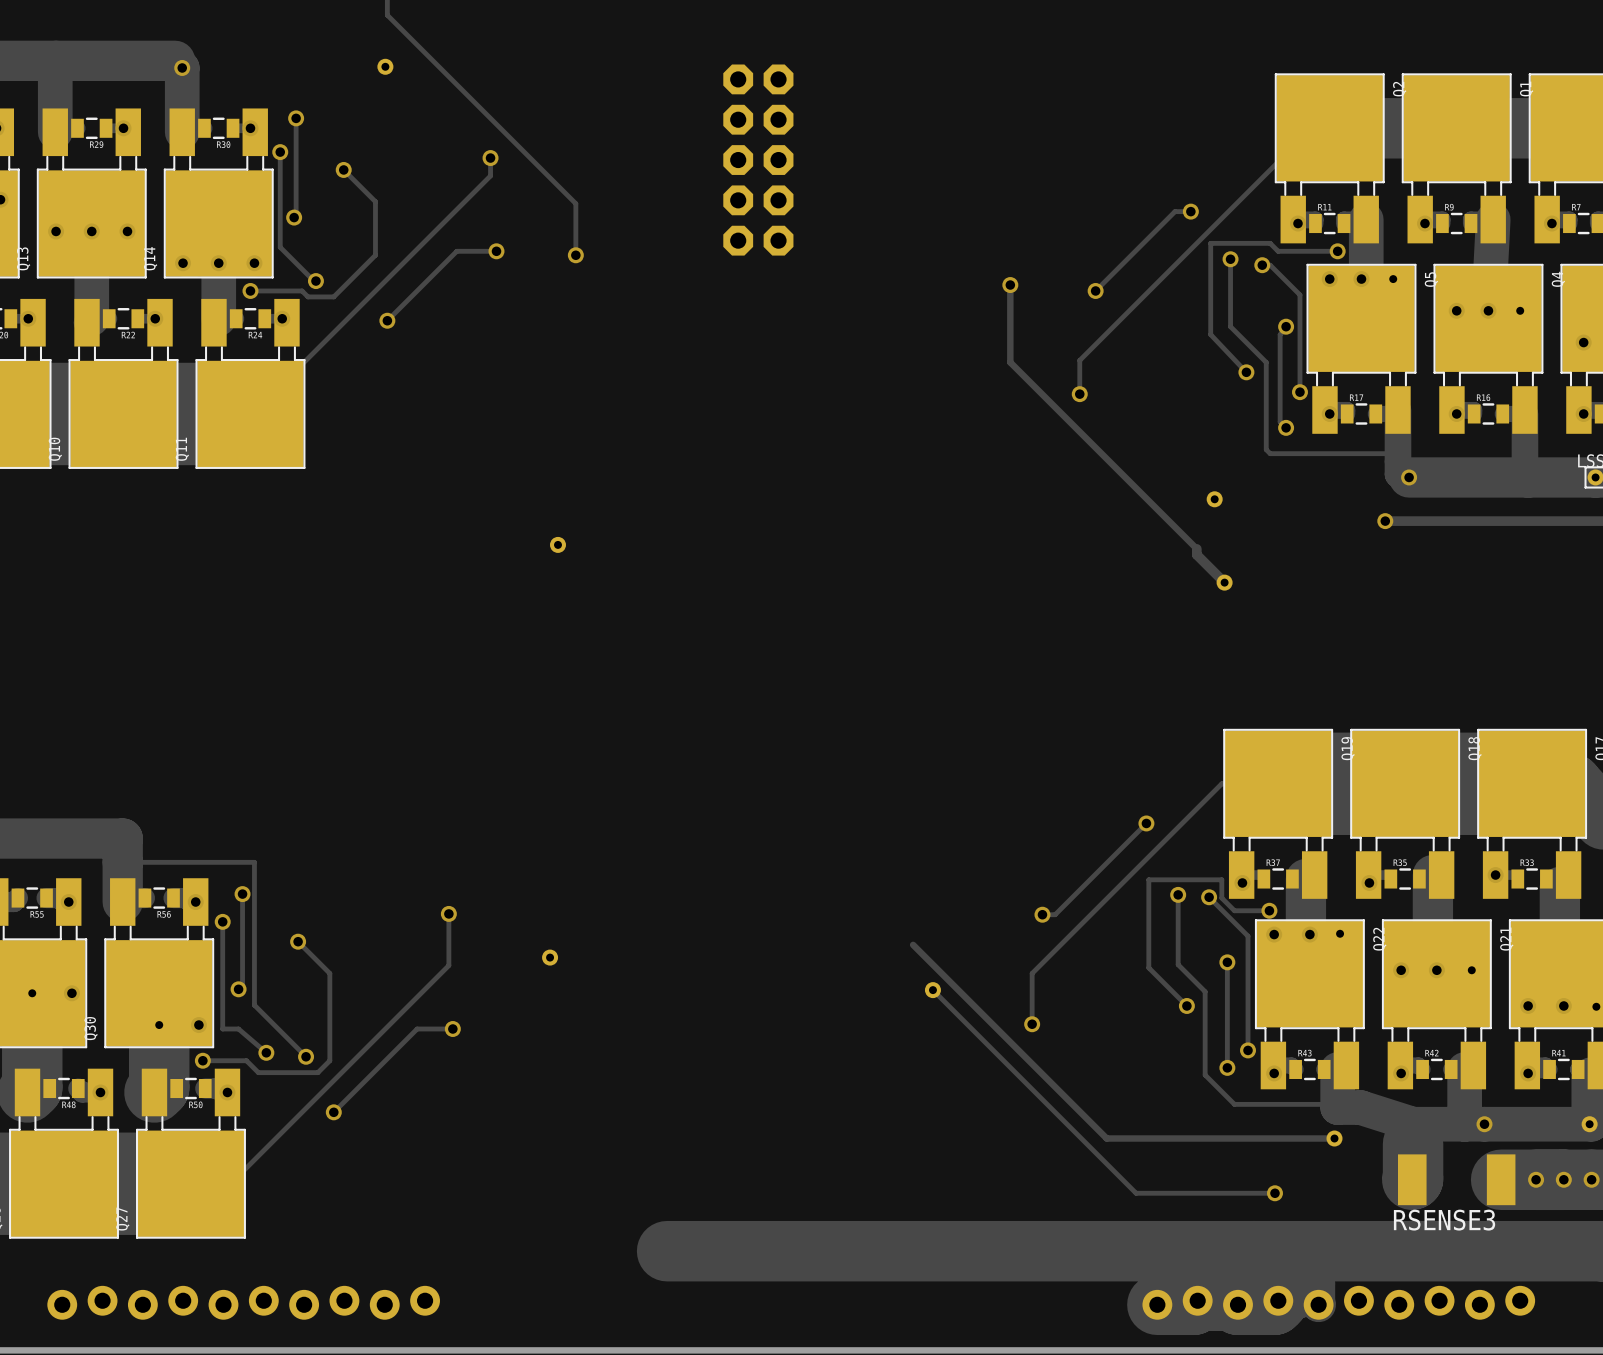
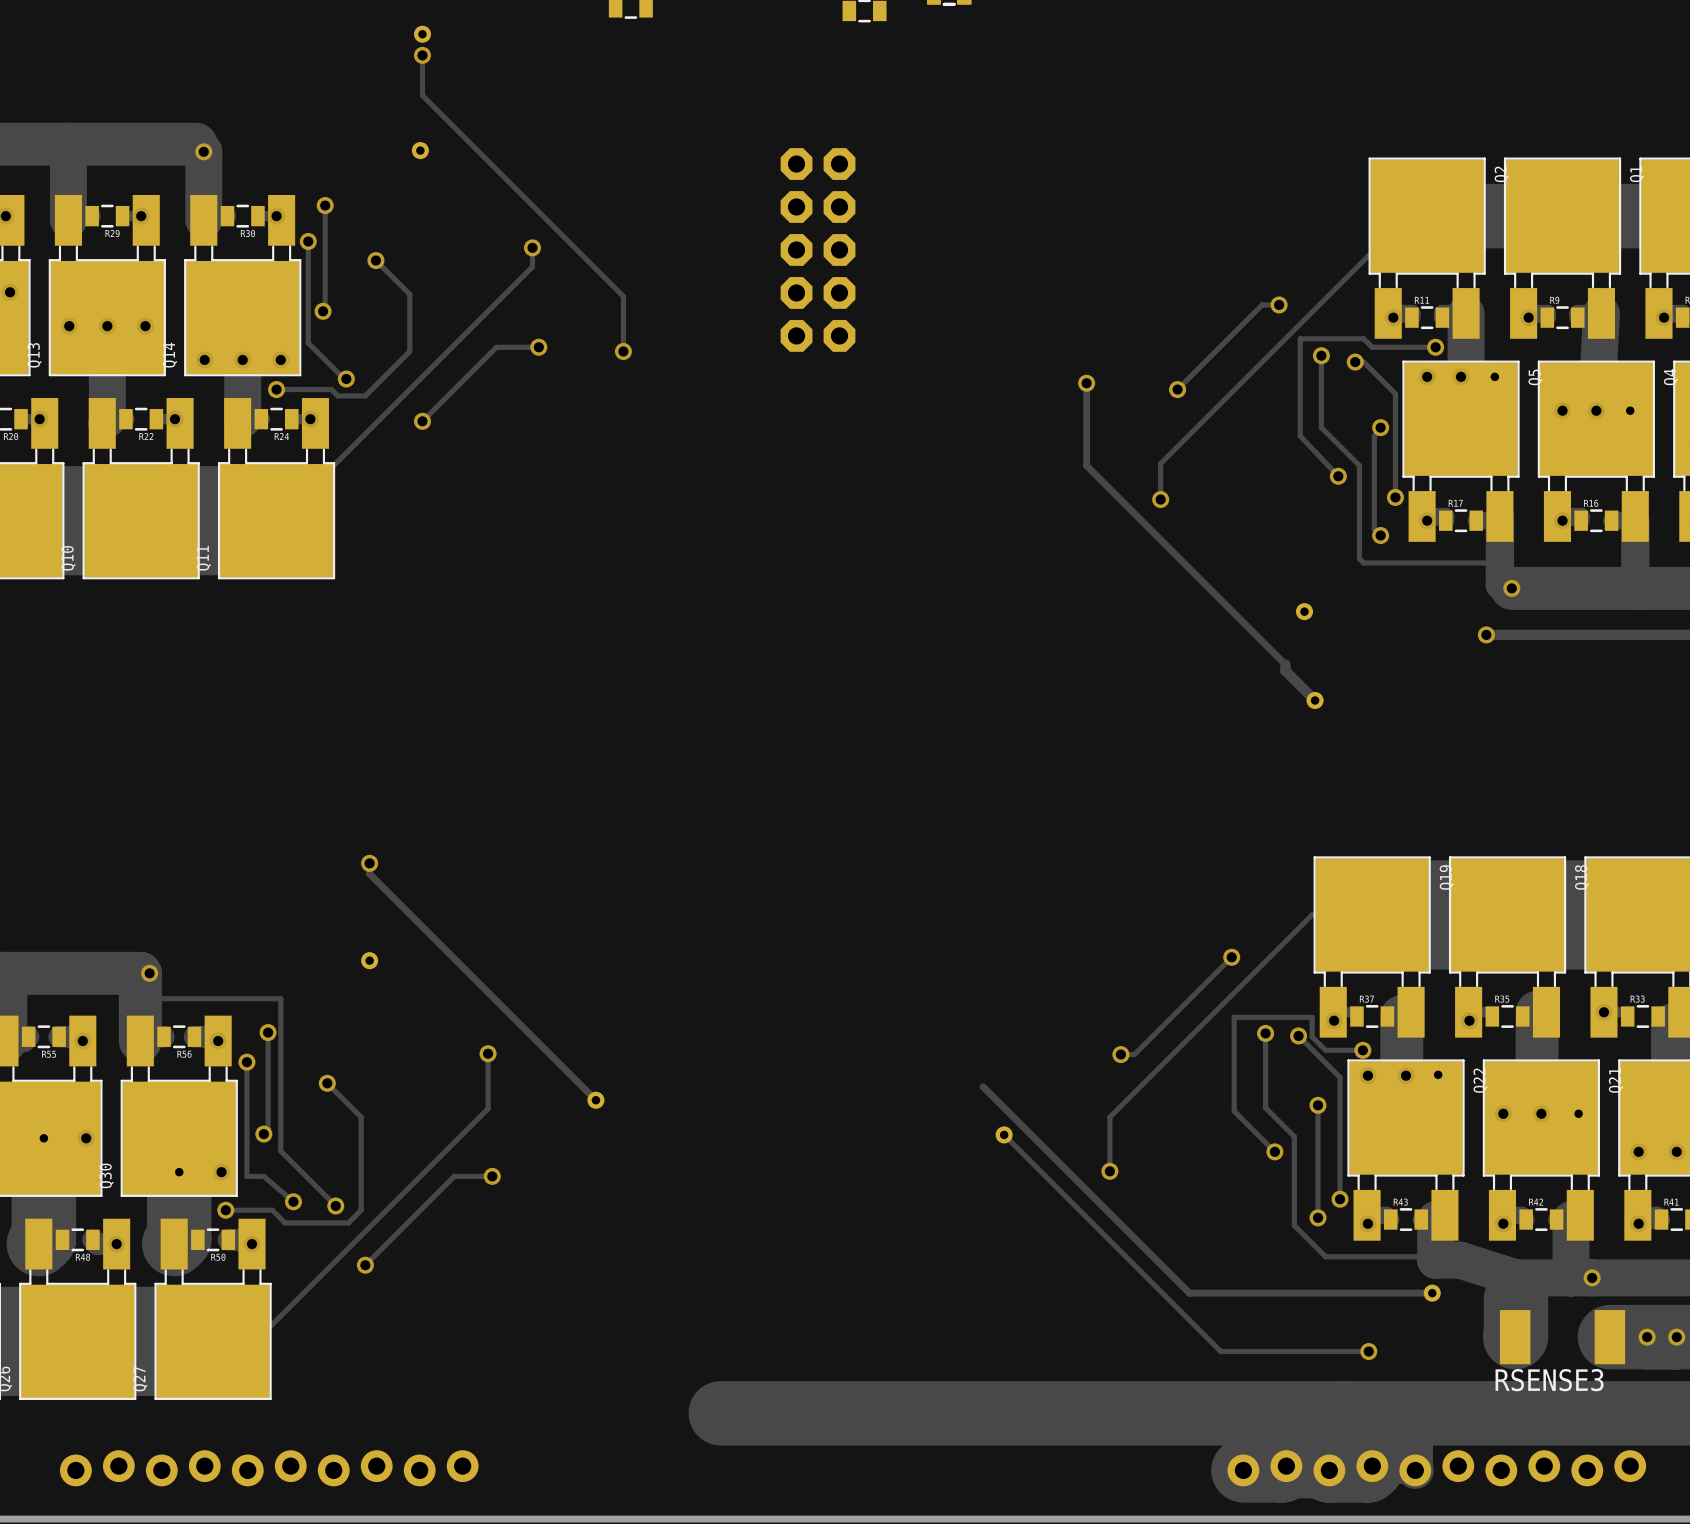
part position: (557, 544) -> (369, 960)
track: none -> (369, 863) (369, 873) (595, 1100)
via: none -> (369, 863)
via: none -> (149, 973)

